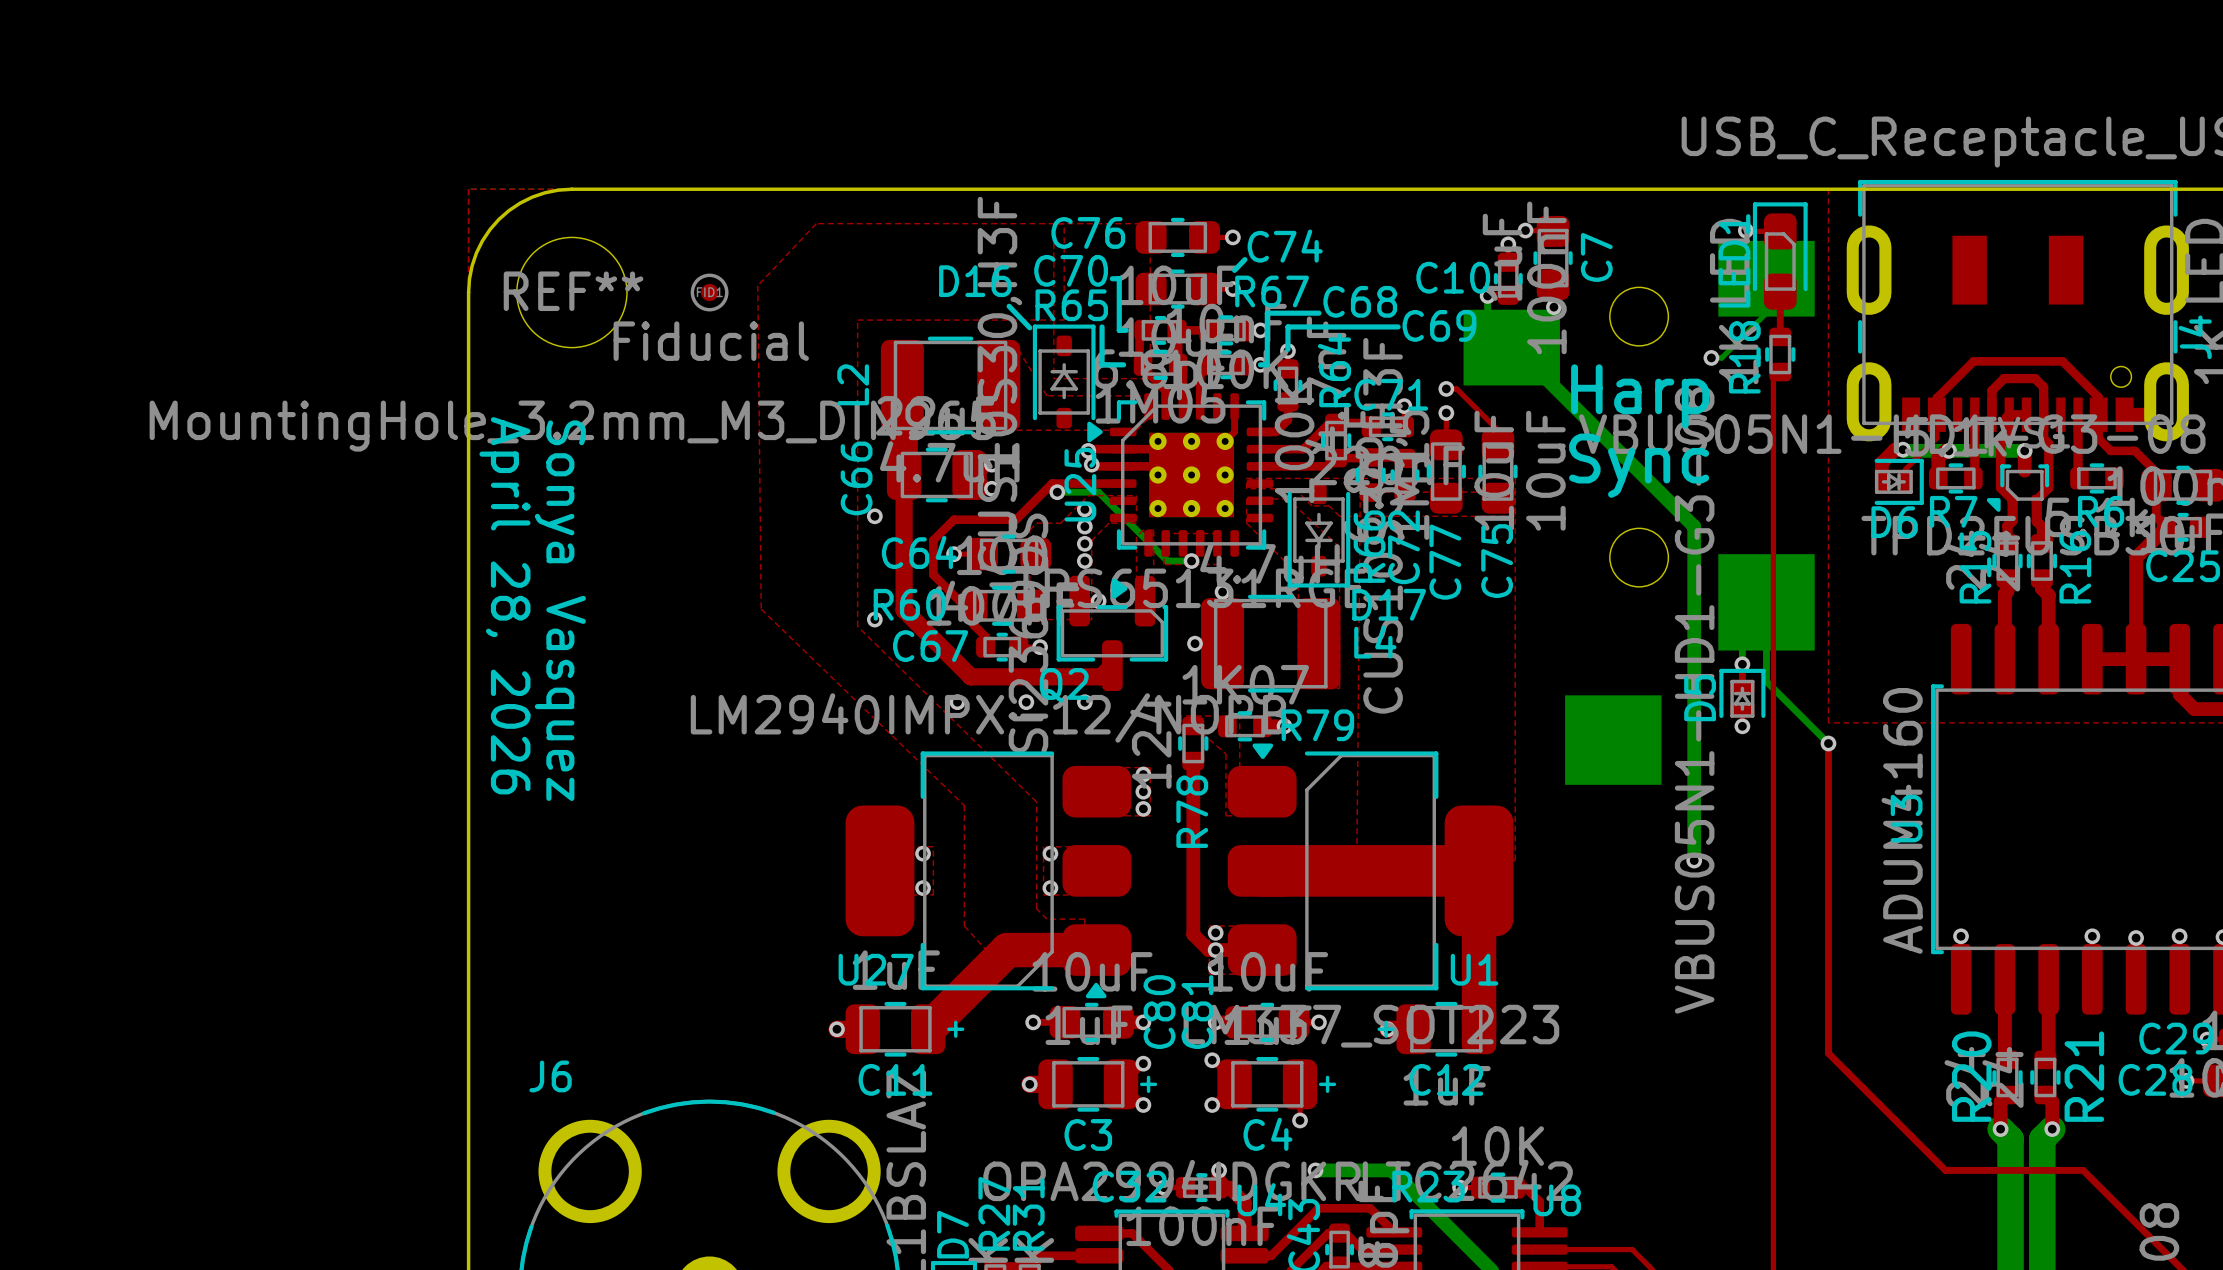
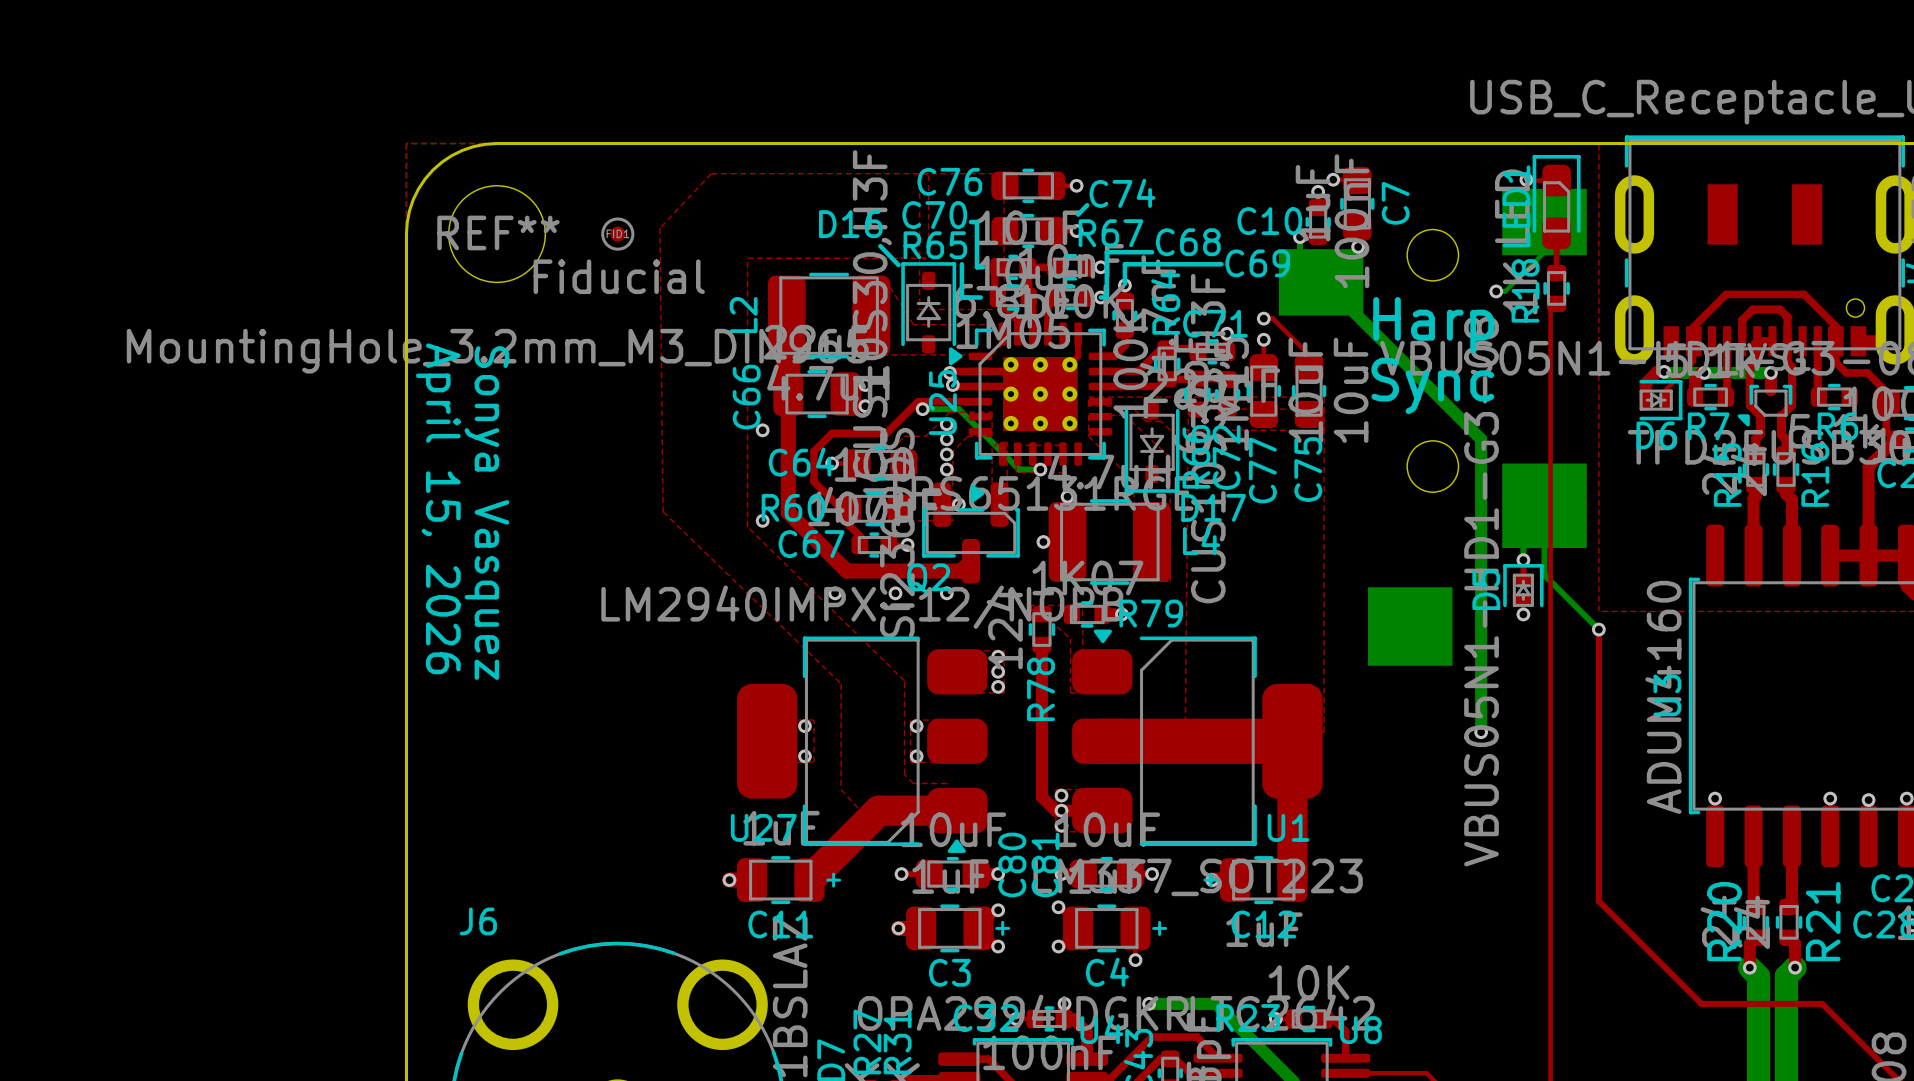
text: April 28, 2026 (504, 605) -> April 15, 2026 (438, 508)

